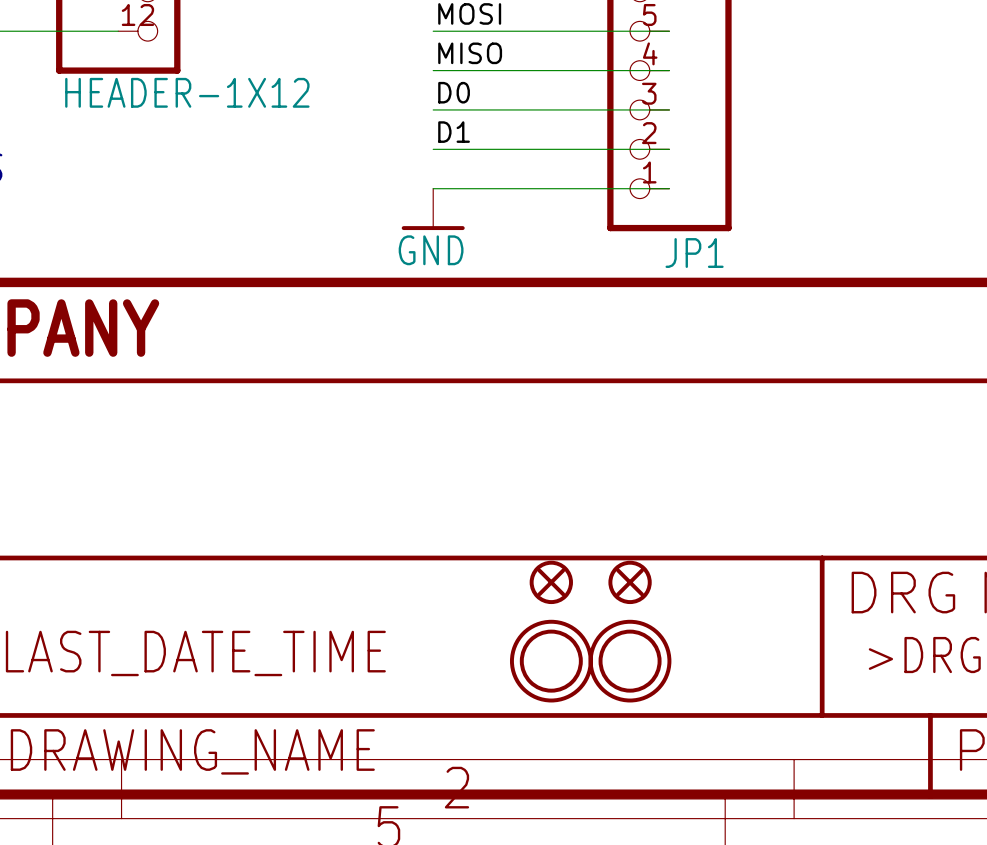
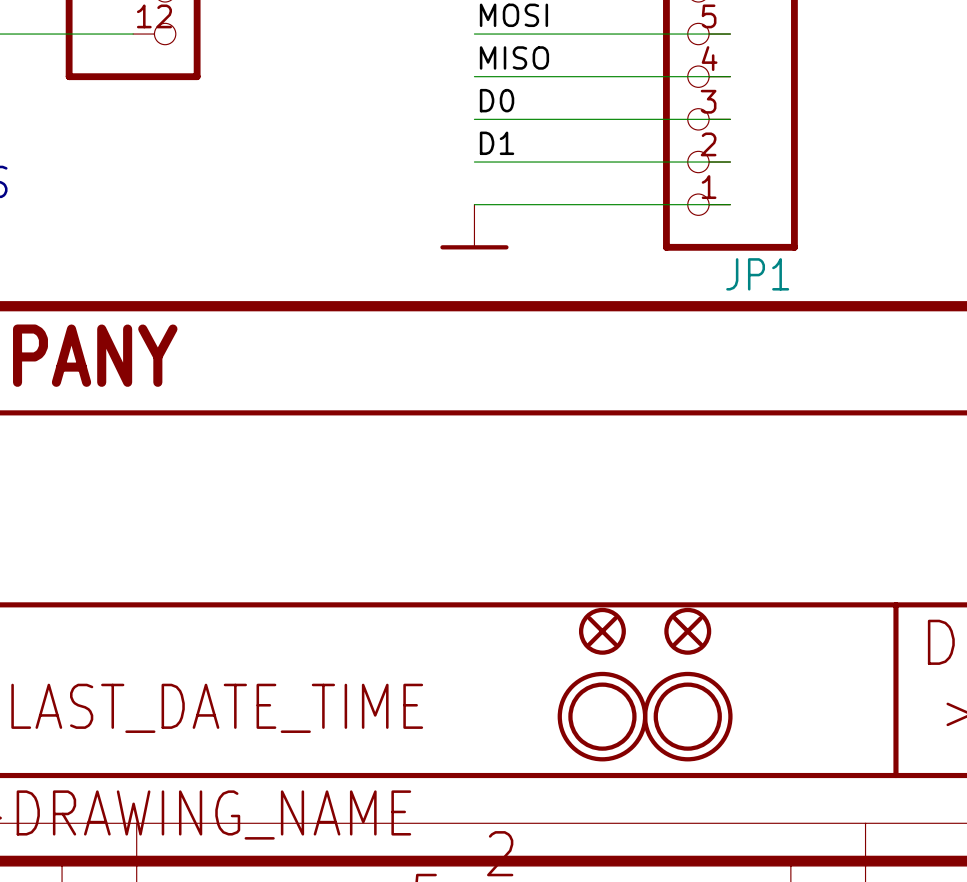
part value: HEADER-1X12 (187, 92) -> none
power symbol text: GND (431, 250) -> none

